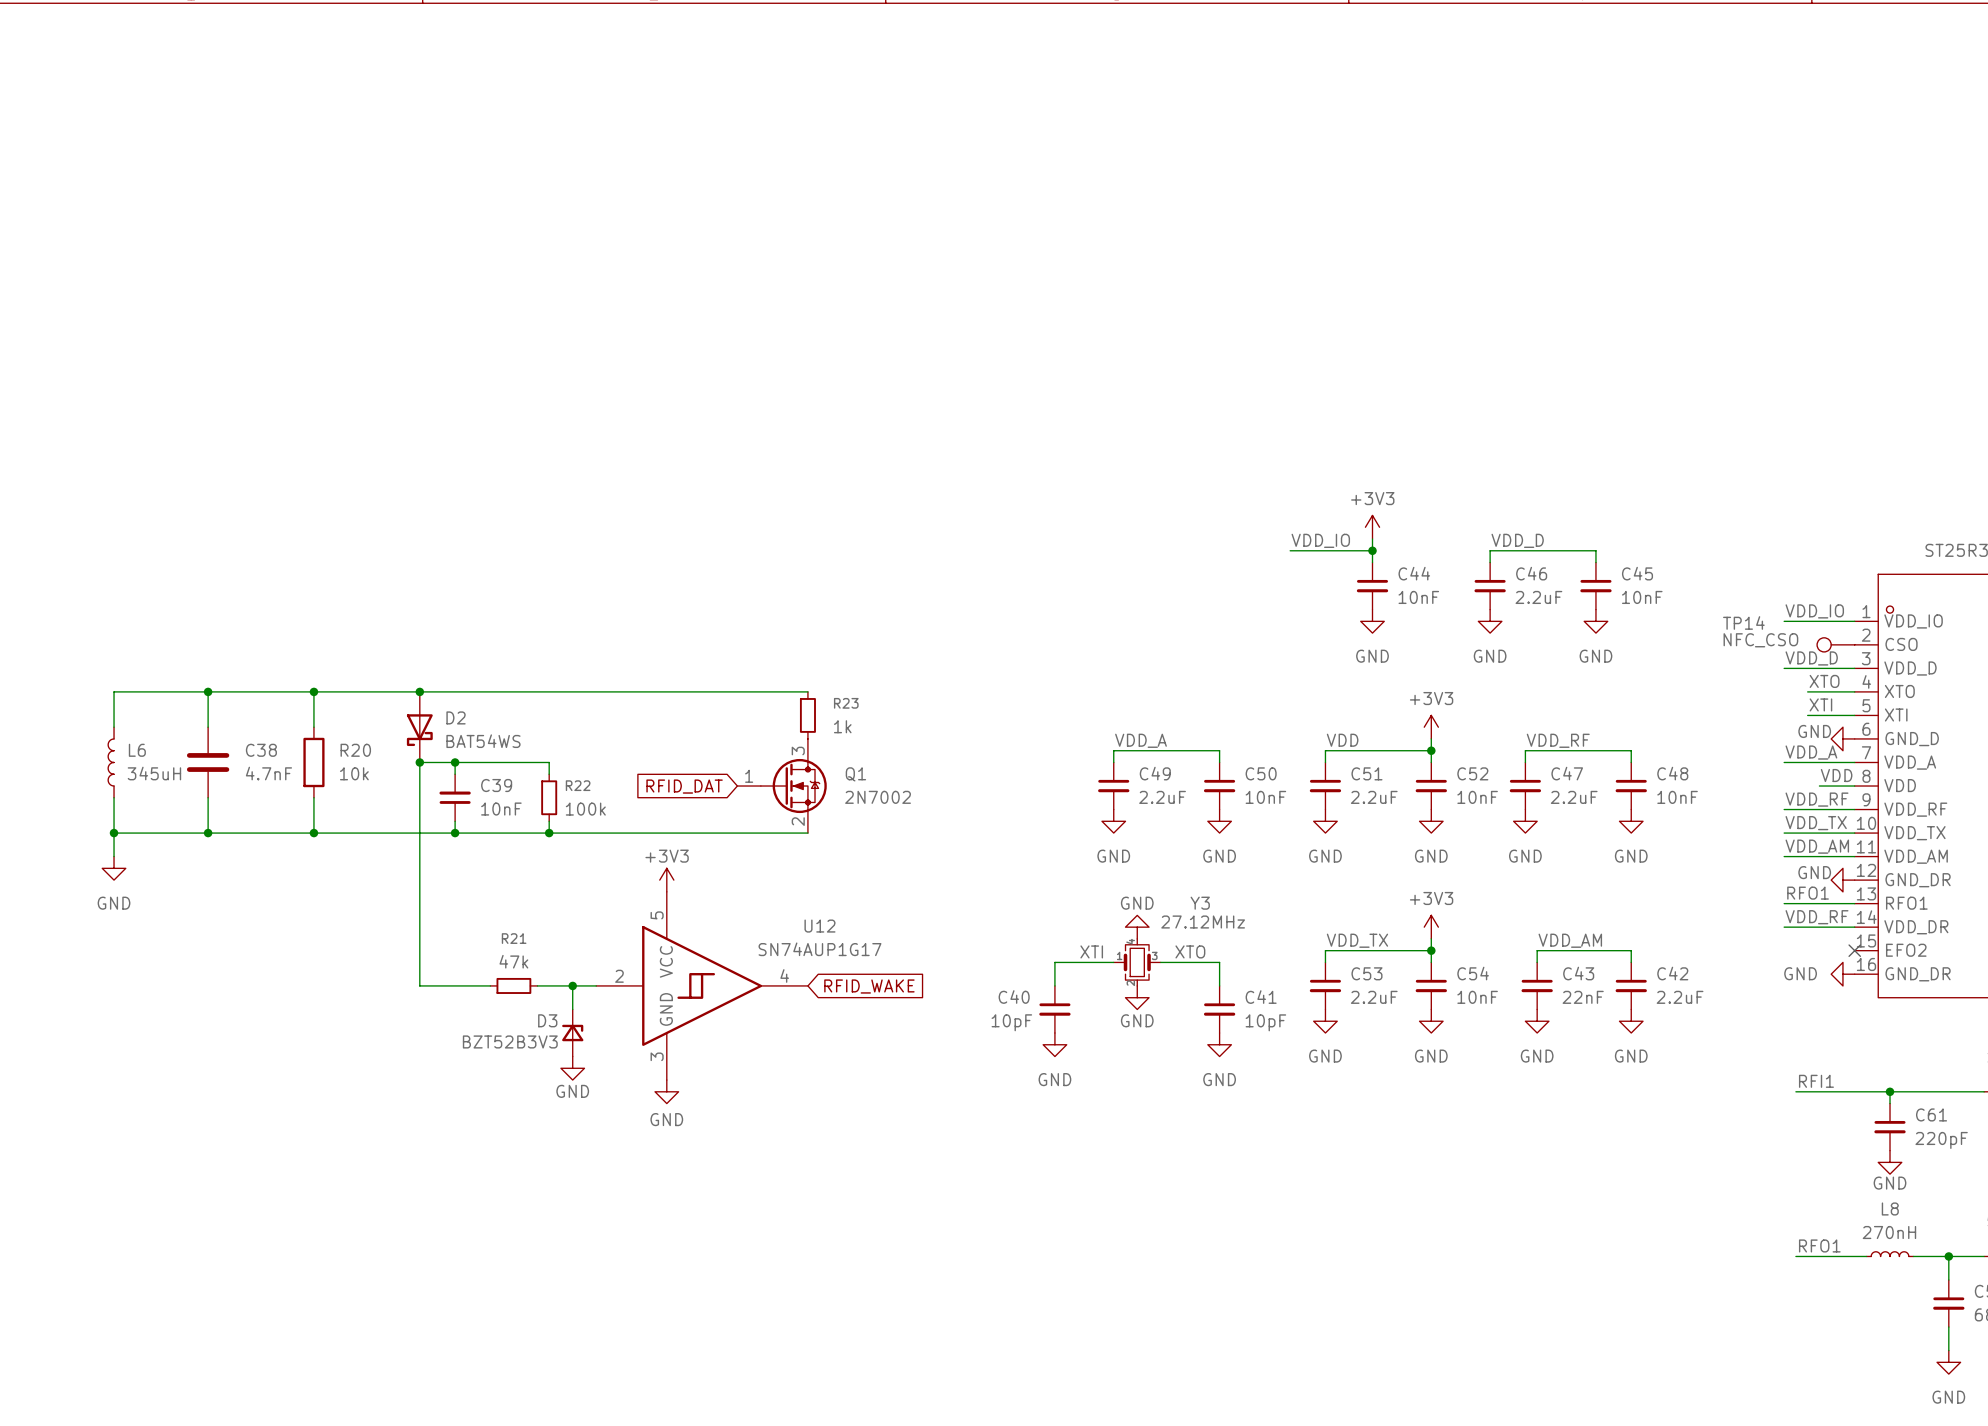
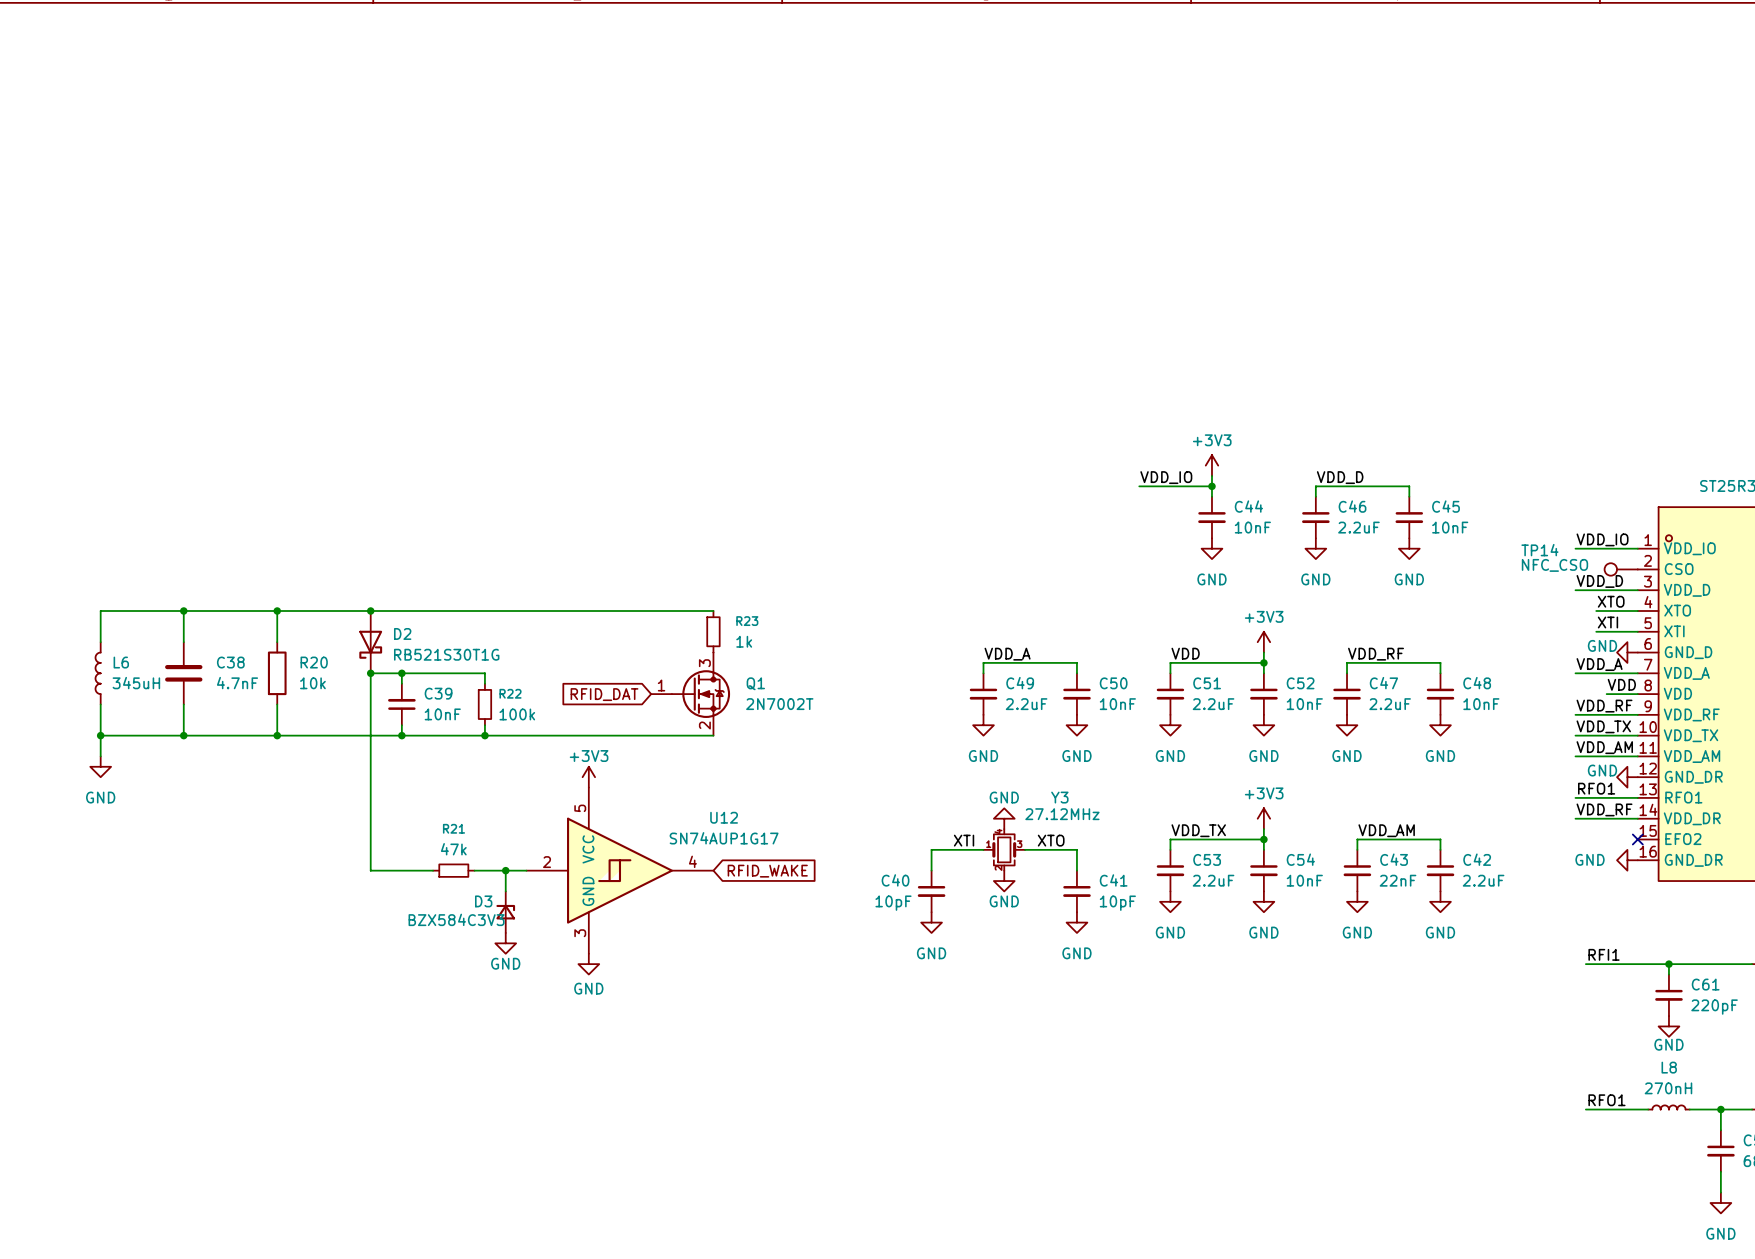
D2 value: BAT54WS (483, 741) -> RB521S30T1G (446, 654)
Q1 value: 2N7002 (878, 797) -> 2N7002T (779, 704)
D3 value: BZT52B3V3 (510, 1041) -> BZX584C3V3 (456, 919)

